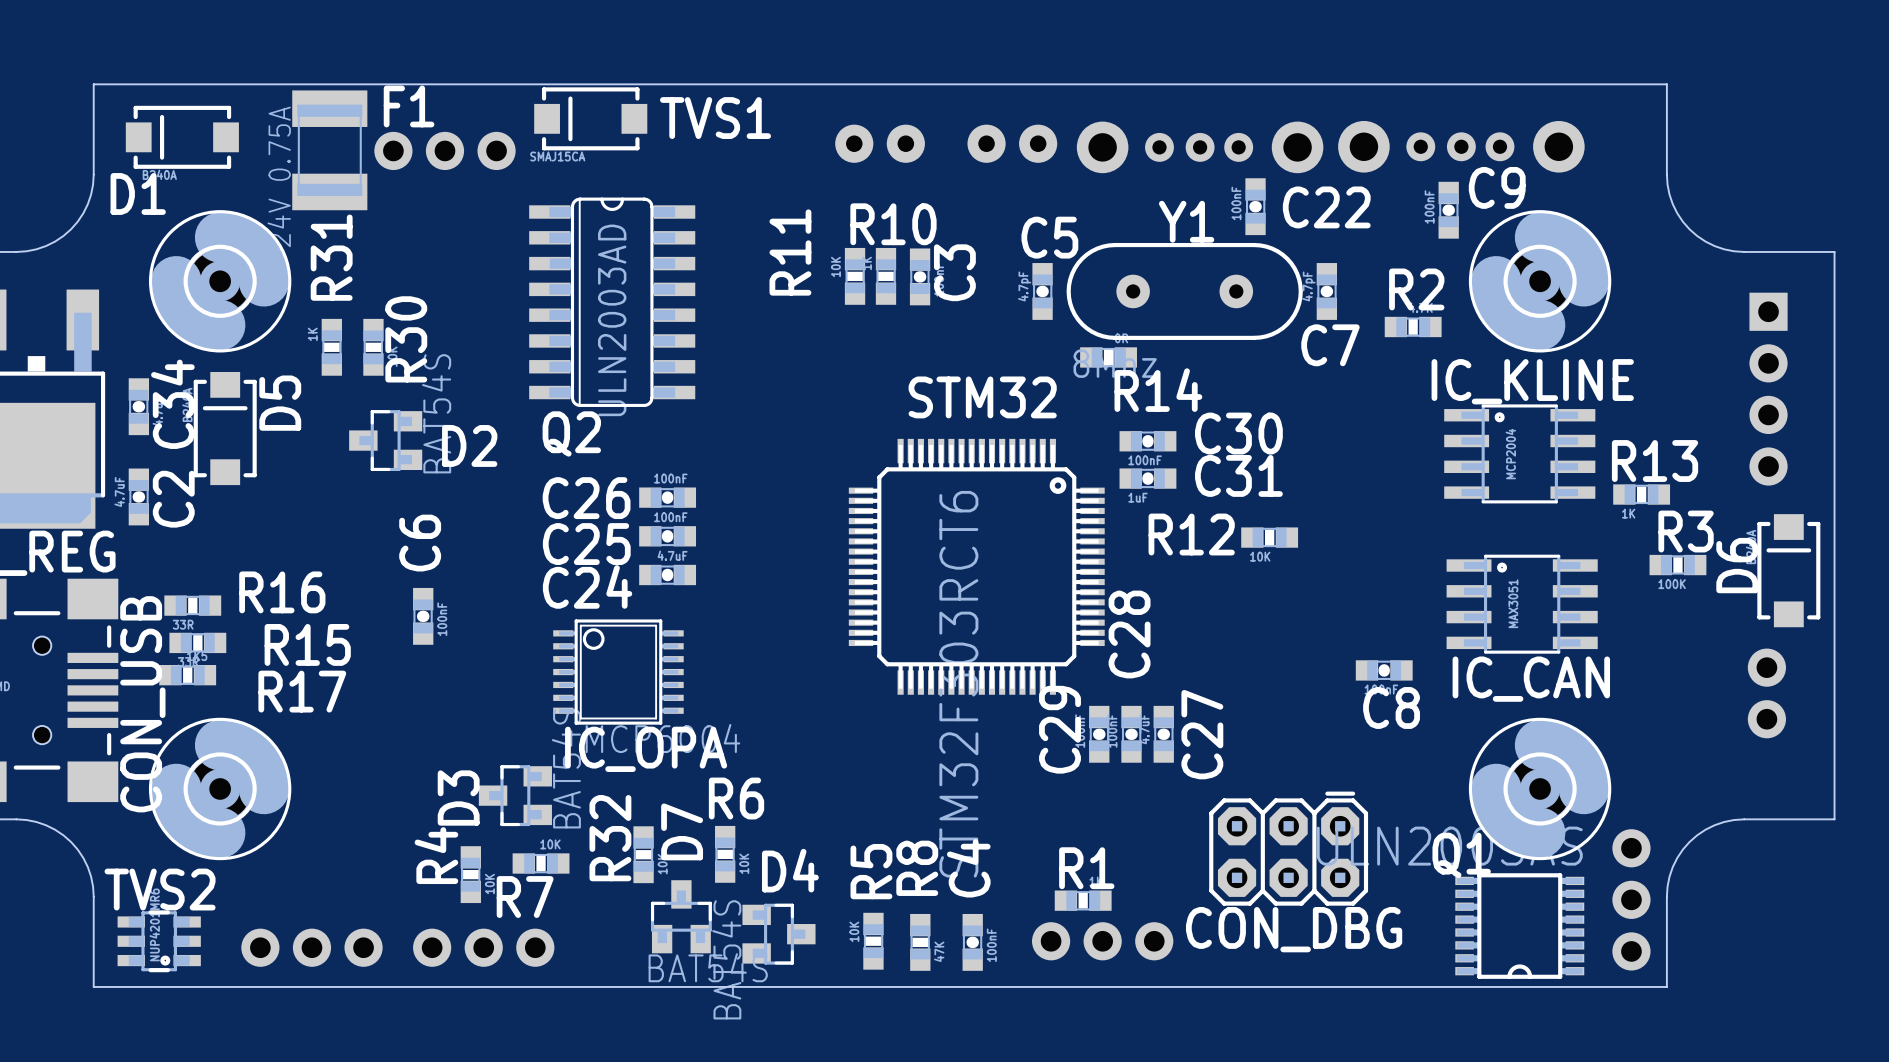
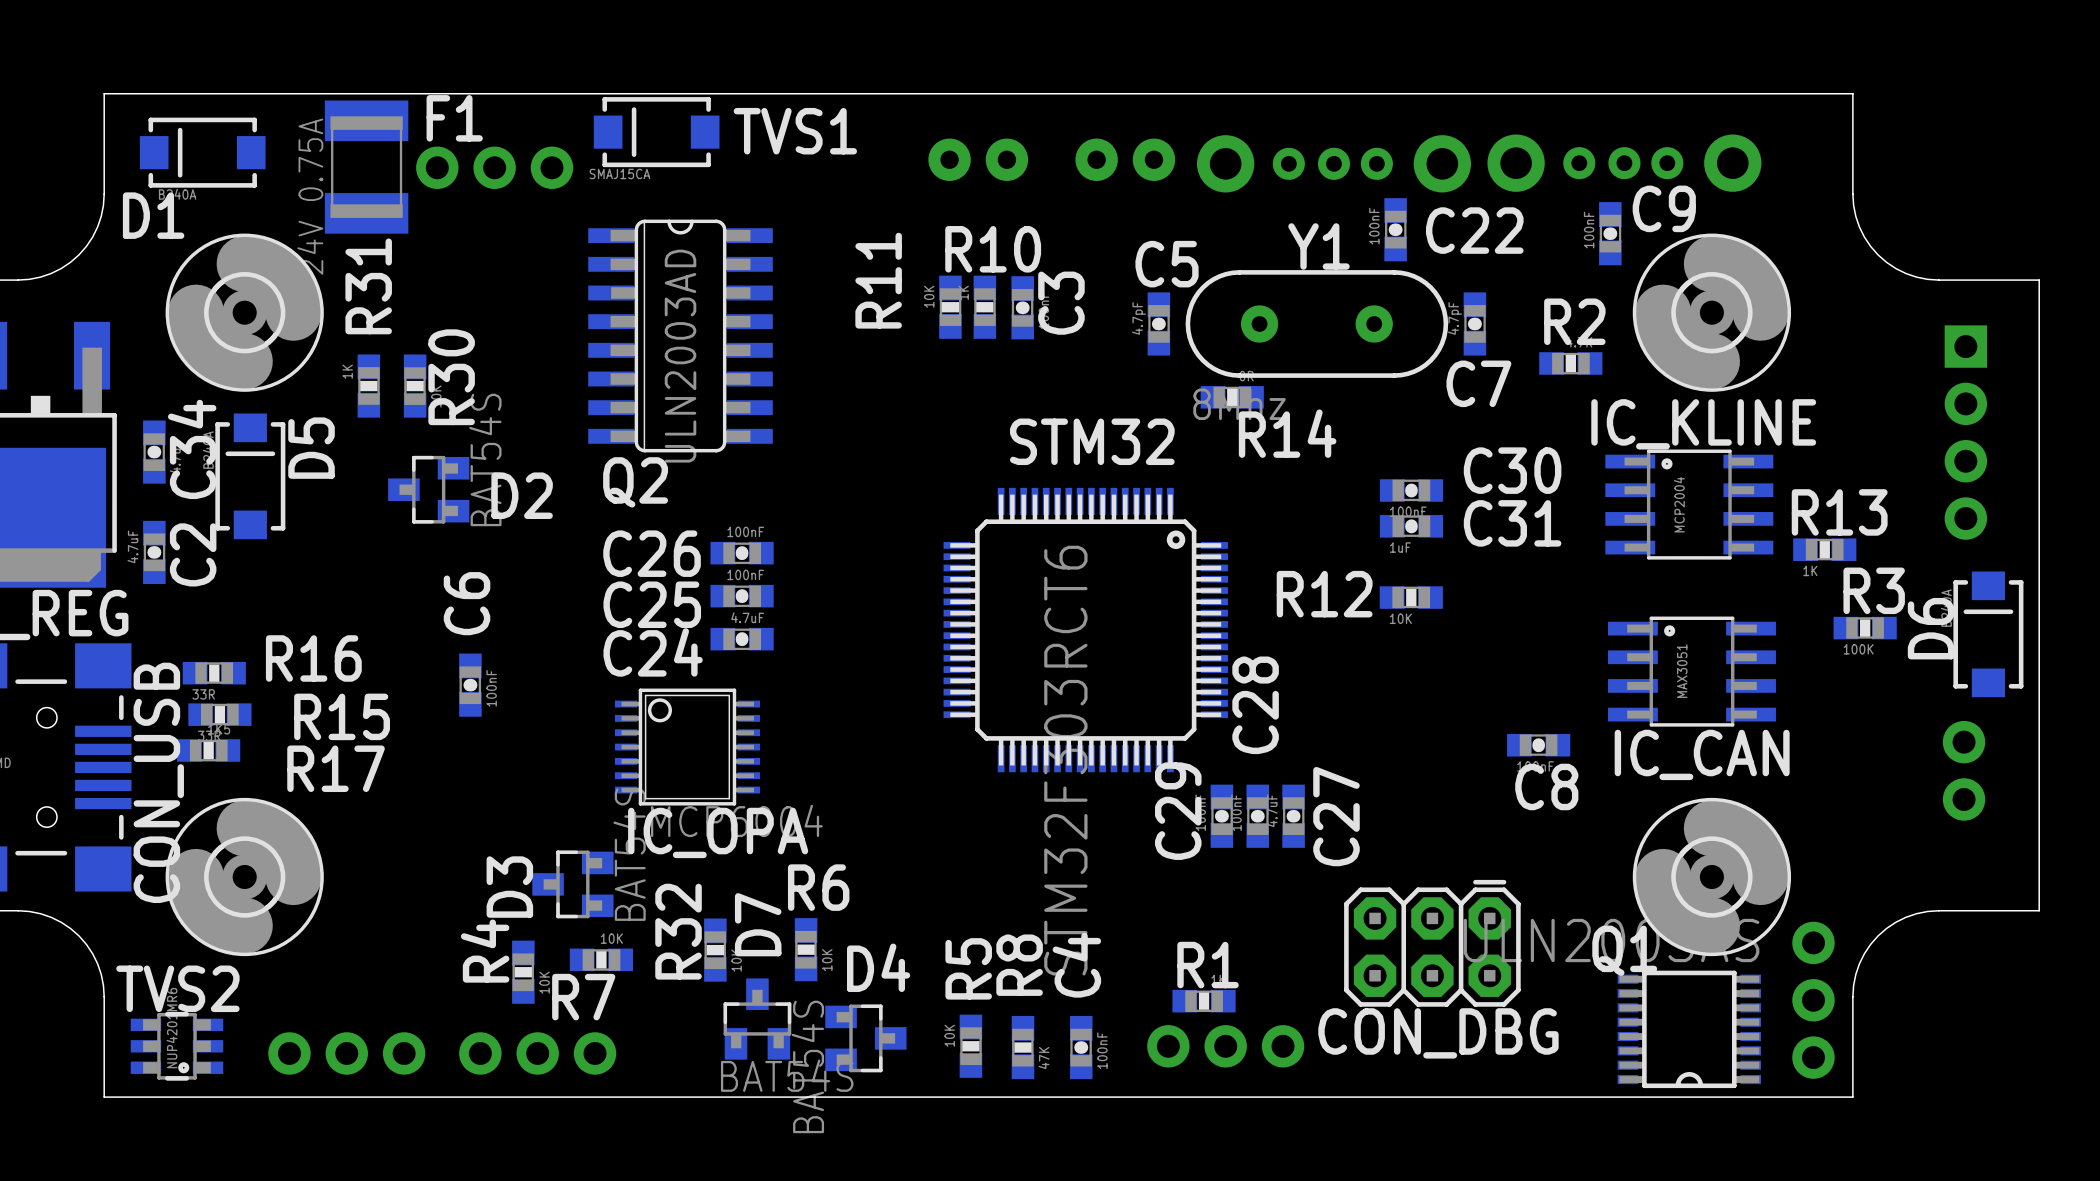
C30 name position: C30 (1238, 433) -> C30 (1512, 470)
C30 position: (1147, 441) -> (1411, 490)
C31 position: (1147, 478) -> (1411, 526)

